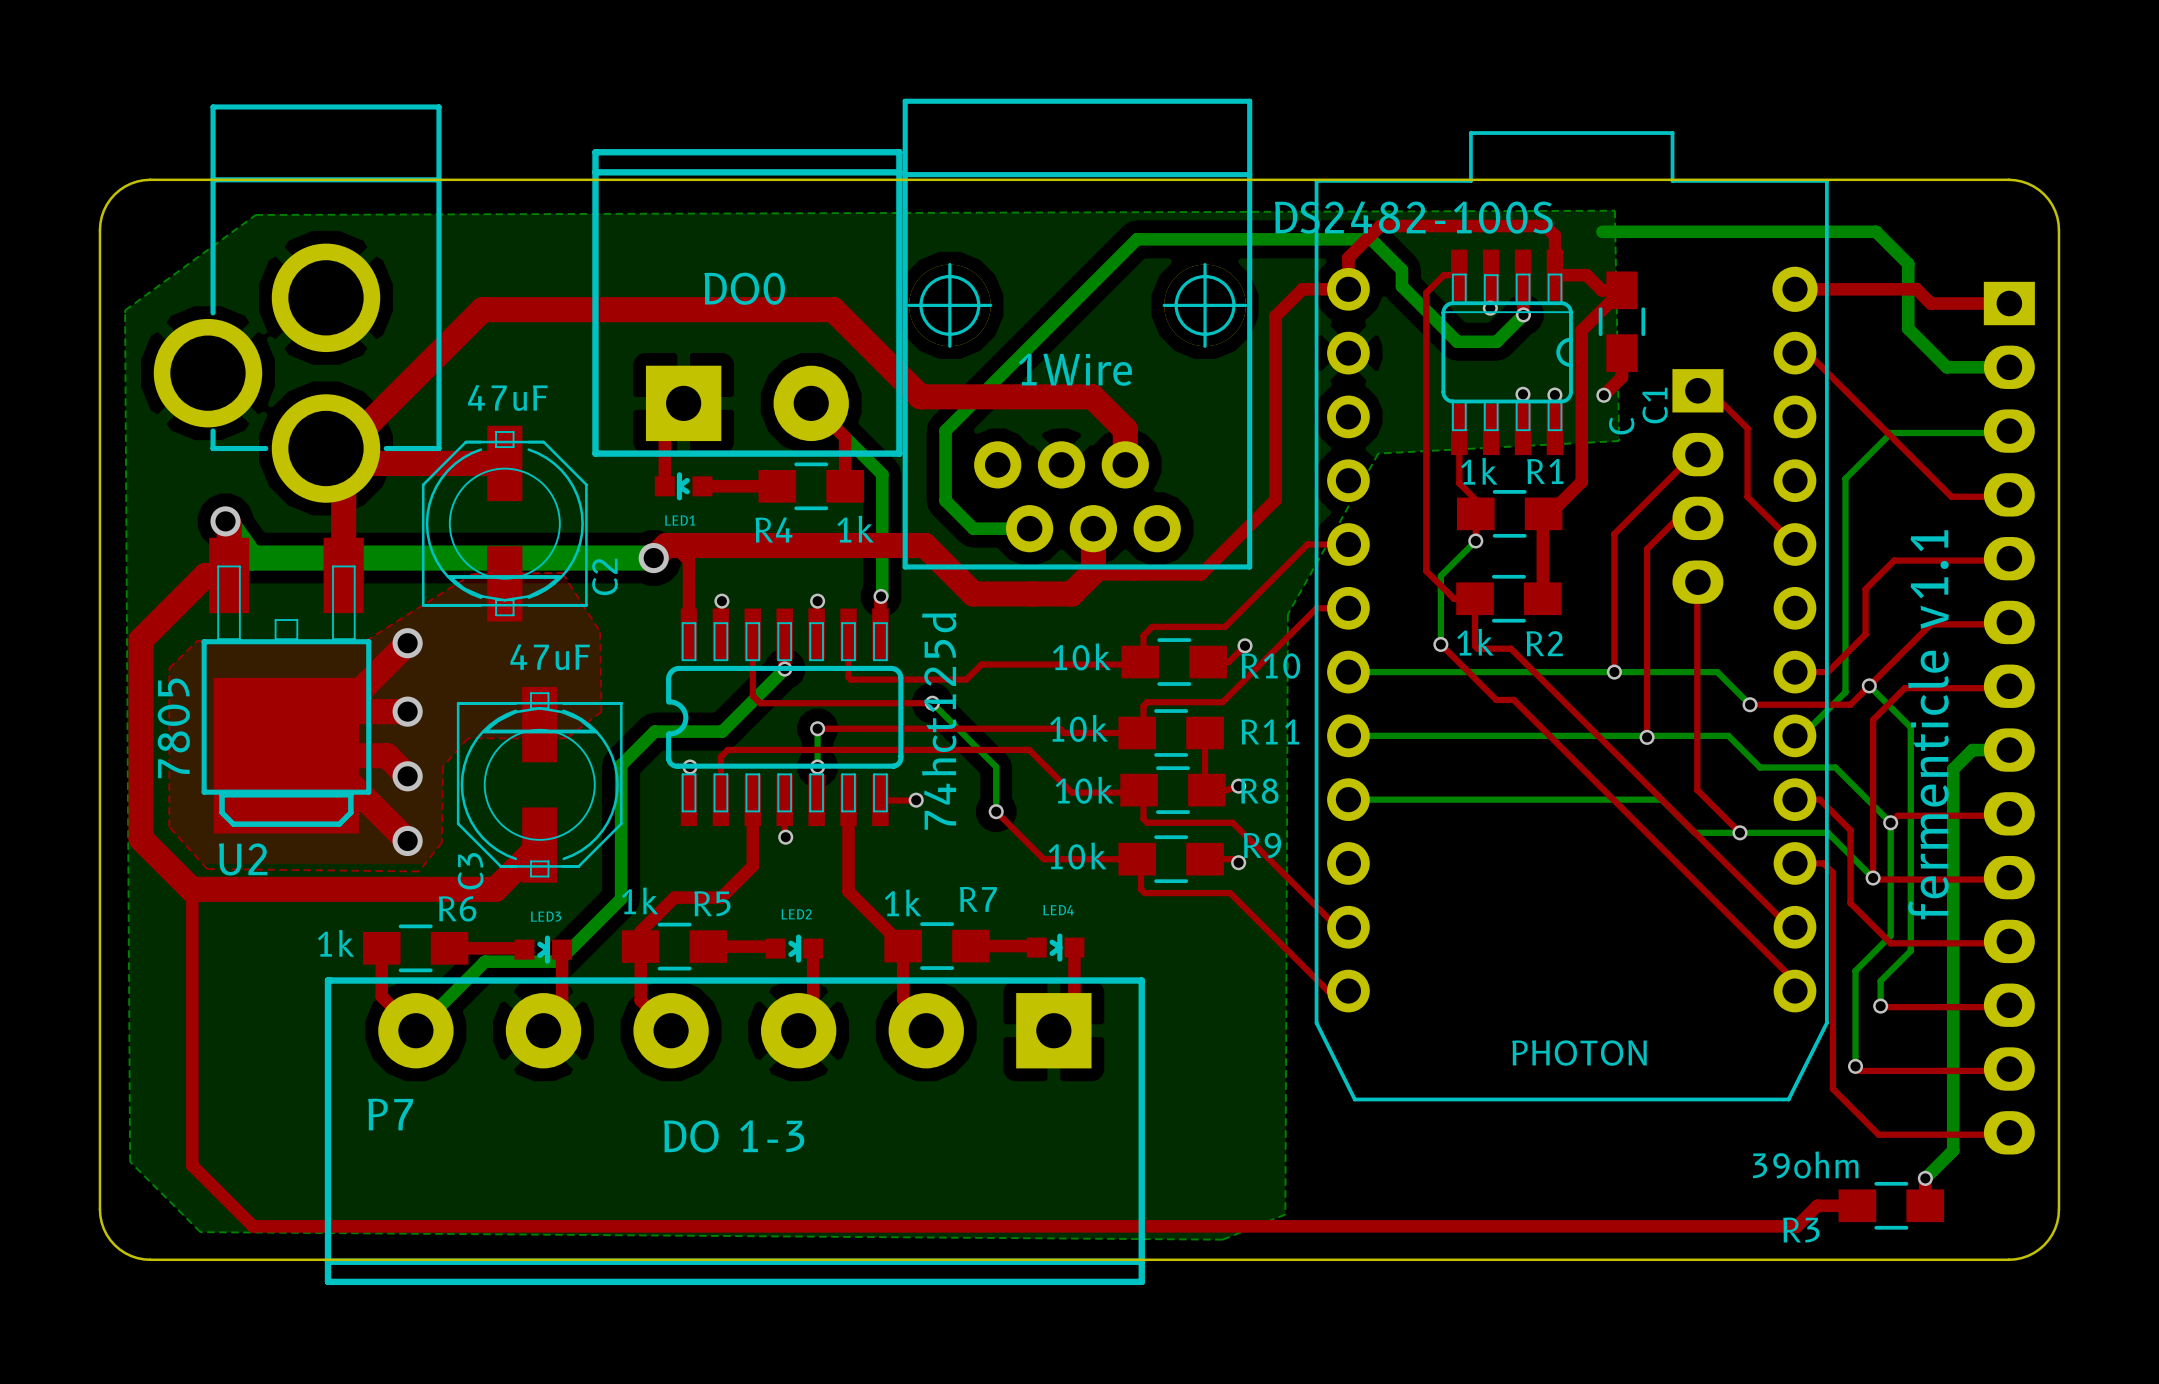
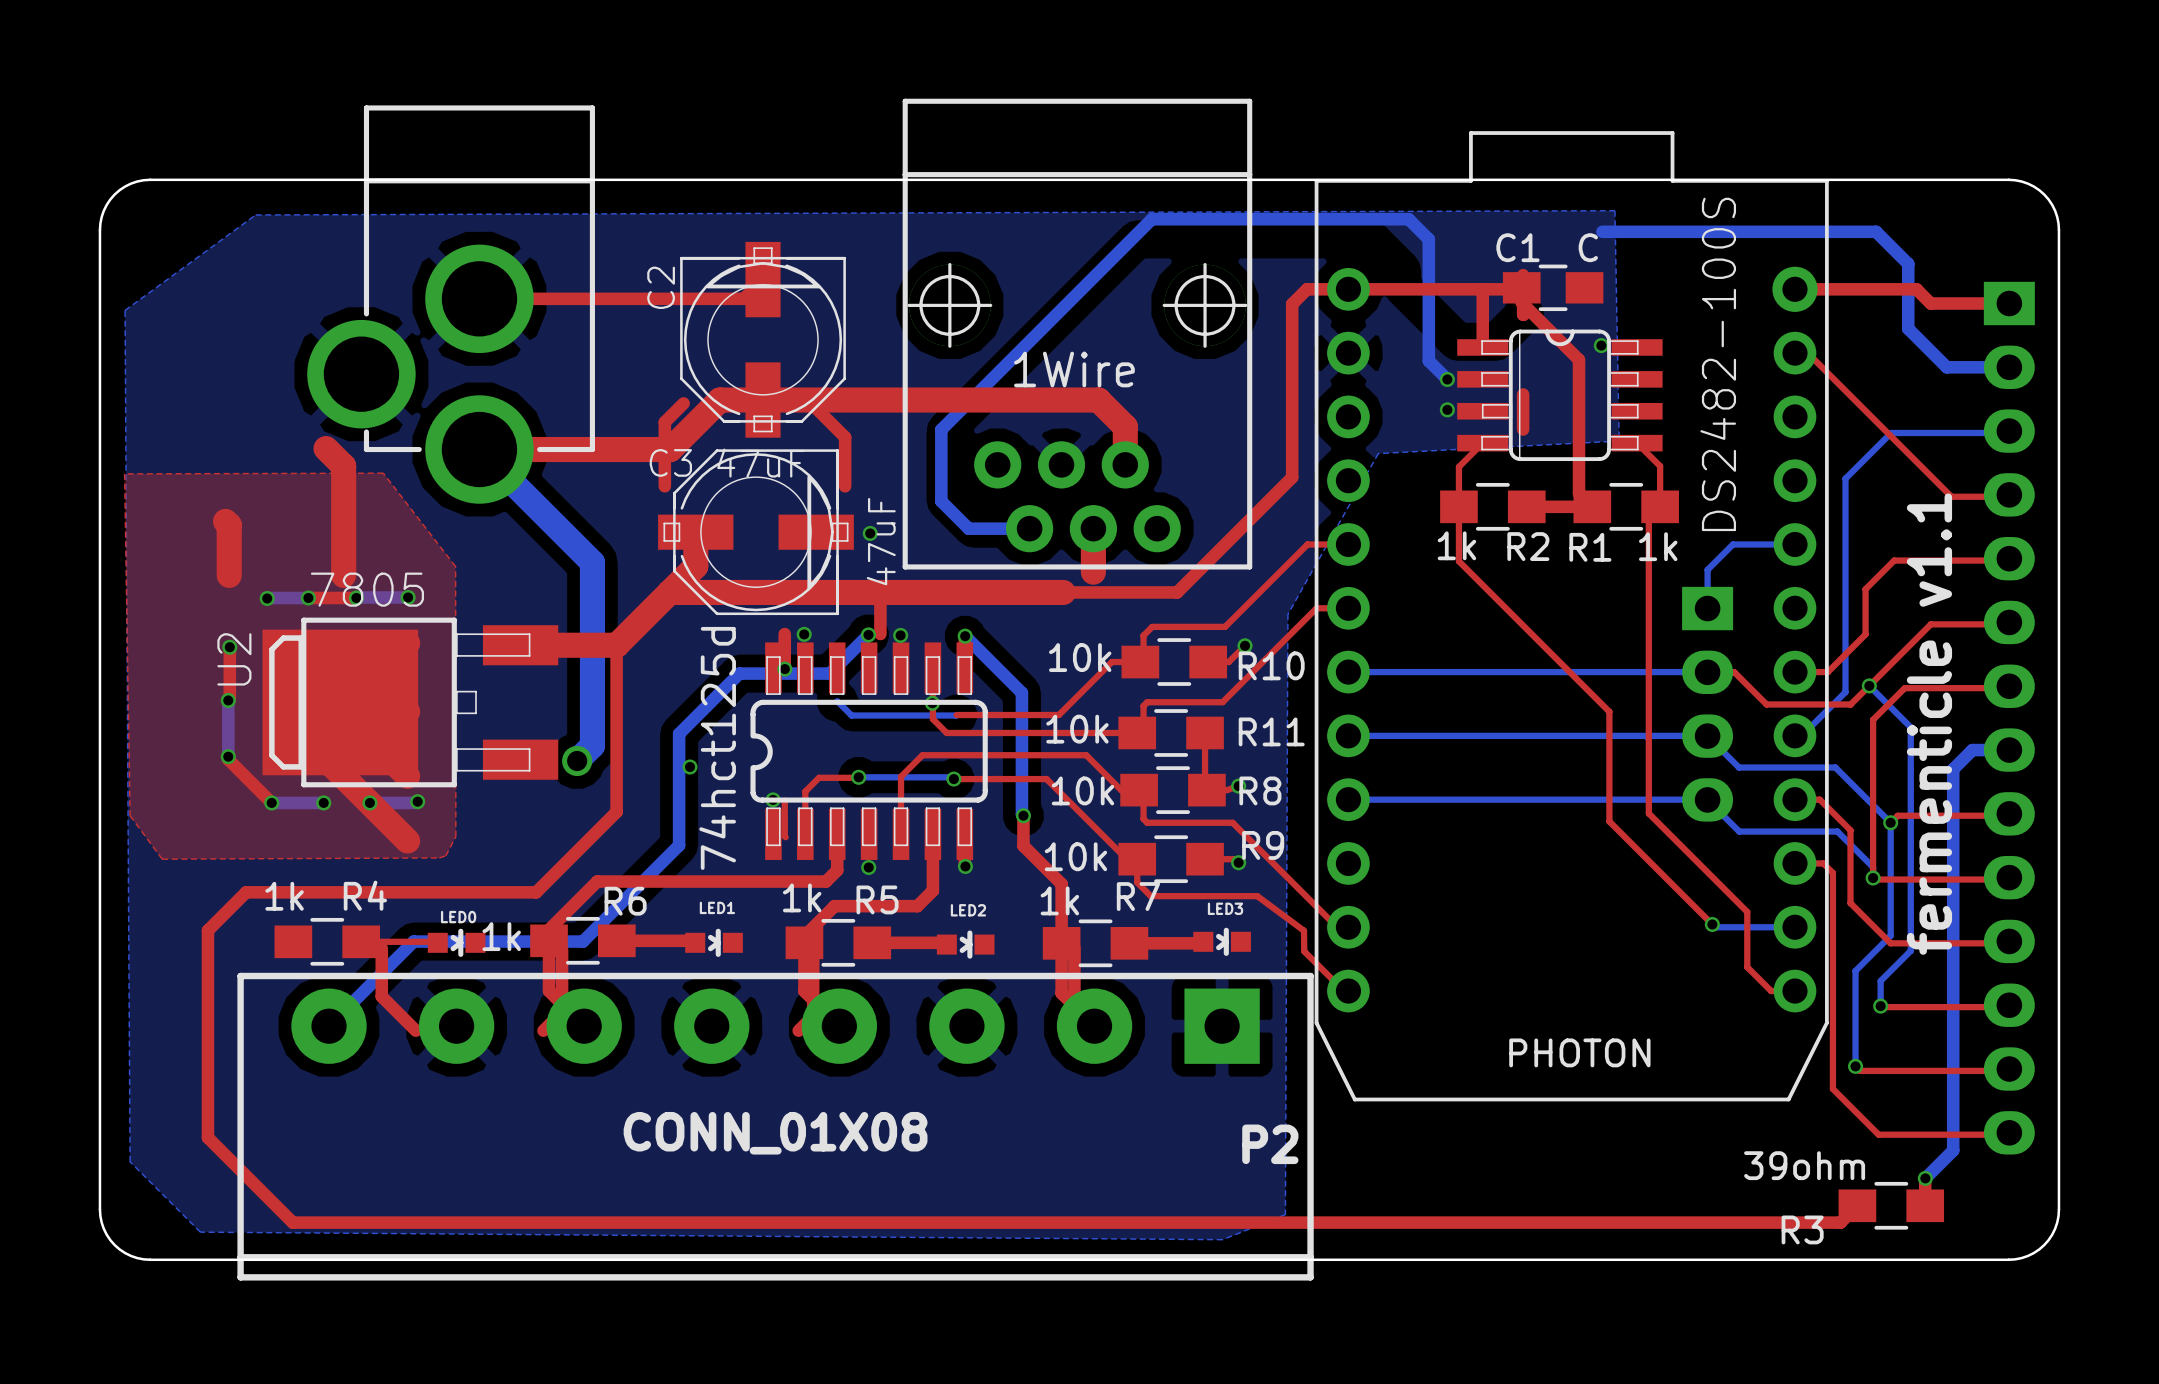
part value position: DS2482-100S (1413, 217) -> DS2482-100S (1718, 364)
top track: (1459, 275) (1443, 275) (1426, 292) (1426, 571) (1453, 598) (1475, 598) (1475, 646) (1477, 648) (1510, 648) (1789, 927) (1795, 927) -> none
top track: none -> (763, 279) (743, 298) (479, 298)
top track: (1307, 289) (1302, 289) (1275, 316) (1275, 499) (1201, 574) (1095, 574) (1093, 572) (1071, 593) (973, 593) (925, 545) (666, 545) (653, 558) -> (1307, 289) (1292, 304) (1292, 477) (1177, 592) (669, 592)
top track: (1348, 289) (1348, 257) (1380, 226) (1545, 226) (1555, 235) (1555, 275) (1586, 275) (1601, 290) (1621, 290) (1581, 330) (1581, 481) (1549, 513) (1542, 514) (1542, 598) -> (1348, 289) (1521, 287) (1521, 302) (1579, 359) (1579, 493) (1592, 506) (1526, 506)
top track: none -> (1482, 289) (1482, 347)
part: DO0 (747, 302) -> none
part position: (297, 303) -> (451, 304)
via: (1490, 308) -> none
bottom track: (1523, 314) (1496, 341) (1457, 341) (1401, 286) (1401, 269) (1371, 239) (1136, 239) (945, 430) (945, 500) (973, 528) -> (1447, 379) (1428, 360) (1428, 239) (1408, 219) (1151, 219) (941, 429) (941, 501) (968, 528) (973, 528)
via: (1523, 314) -> none
C1 rotation: 0° (1621, 321) -> 90° clockwise (1553, 287)
C1 position: (1621, 321) -> (1553, 287)
via: none -> (1601, 345)
part rotation: 0° (1507, 352) -> 90° counterclockwise (1559, 395)
top track: (1621, 353) (1621, 377) (1603, 395) -> none
via: none -> (1447, 379)
top track: (1697, 387) (1706, 387) (1747, 428) (1747, 497) (1795, 544) -> none
via: (1523, 394) -> none
via: (1554, 395) -> none
via: (1603, 395) -> none
bottom track: (836, 403) (811, 403) (882, 474) (881, 596) -> none
C1 name position: C1 (1655, 405) -> C1 (1517, 247)
via: none -> (1447, 409)
C1 value position: C (1621, 425) -> C (1588, 247)
top track: (1125, 429) (1092, 396) (920, 396) (833, 309) (482, 309) (343, 448) (305, 448) -> (1125, 429) (1125, 426) (1098, 400) (719, 400) (670, 449) (479, 449)
top track: (1459, 429) (1459, 483) (1475, 499) (1475, 540) -> none
top track: none -> (1482, 443) (1458, 466) (1458, 561) (1609, 711) (1609, 821) (1712, 924)
bottom track: none -> (479, 449) (592, 562) (592, 745) (577, 760)
top track: (1696, 451) (1614, 533) (1614, 672) -> none
top track: (340, 463) (504, 463) -> none
R1 value position: 1k (1479, 471) -> 1k (1658, 546)
R1 name position: R1 (1545, 471) -> R1 (1590, 547)
top zone outline: none -> (383, 473) (455, 566) (455, 836) (445, 855) (439, 857) (162, 859) (130, 815) (124, 473) (383, 473)
LED1 rotation: 0° (683, 486) -> 180° (714, 942)
LED1 position: (683, 486) -> (714, 942)
top track: (702, 486) (777, 486) -> none
R4 position: (811, 486) -> (327, 941)
part position: (1697, 486) -> (1707, 704)
R1 position: (1509, 513) -> (1626, 506)
top track: (1697, 515) (1680, 515) (1647, 549) (1647, 737) -> none
bottom track: (225, 521) (251, 558) (653, 558) -> none
via: (225, 521) -> none
C2 rotation: 0° (504, 523) -> 180° (763, 339)
C2 position: (504, 523) -> (763, 339)
R4 name position: R4 (773, 529) -> R4 (365, 895)
R4 value position: 1k (855, 529) -> 1k (284, 896)
top track: none -> (695, 532) (695, 566) (616, 645) (520, 645)
via: none -> (870, 533)
bottom track: (1475, 540) (1440, 575) (1440, 644) -> none
via: (1475, 540) -> none
bottom track: none -> (1795, 544) (1732, 544) (1707, 569) (1707, 608)
top track: (673, 545) (689, 560) (689, 634) -> none
via: (653, 558) -> none
top zone outline: (562, 572) (472, 574) (365, 640) (197, 640) (169, 668) (169, 826) (207, 868) (418, 871) (442, 842) (443, 766) (468, 738) (566, 738) (601, 711) (600, 631) (562, 572) -> none
top track: (210, 575) (229, 575) (205, 575) (141, 639) (141, 838) (191, 889) (495, 889) (539, 845) -> none
top track: (1697, 579) (1697, 790) (1739, 832) -> none
via: (881, 596) -> none
top track: none -> (308, 597) (356, 597)
bottom track: none -> (308, 597) (267, 598)
via: none -> (308, 597)
via: none -> (356, 597)
bottom track: none -> (408, 597) (356, 597)
via: none -> (408, 597)
via: none -> (267, 598)
R2 position: (1508, 598) -> (1492, 506)
via: (721, 601) -> none
via: (817, 601) -> none
top track: (752, 634) (752, 695) (760, 703) (932, 703) -> none
via: none -> (804, 634)
top track: (848, 634) (848, 677) (850, 679) (966, 679) (981, 664) (1143, 664) -> none
bottom track: none -> (868, 634) (829, 673) (739, 673) (679, 733) (679, 845) (582, 941) (413, 941) (329, 1026)
via: none -> (868, 634)
via: none -> (900, 635)
bottom track: none -> (965, 636) (1021, 692) (1023, 815)
via: none -> (965, 636)
R2 value position: 1k (1475, 642) -> 1k (1456, 545)
via: (407, 643) -> none
R2 name position: R2 (1544, 643) -> R2 (1528, 546)
top track: (1440, 644) (1496, 699) (1513, 699) (1795, 981) (1795, 991) -> (1637, 443) (1660, 466) (1660, 506) (1648, 518) (1648, 813) (1747, 911) (1747, 967) (1771, 991) (1795, 991)
via: (1440, 644) -> none
top track: none -> (229, 647) (228, 700)
via: none -> (229, 647)
top track: none -> (1140, 662) (1111, 662) (1058, 715) (956, 715)
bottom track: (784, 669) (722, 731) (654, 731) (621, 765) (621, 898) (558, 961) (484, 961) (415, 1030) -> none
via: (1614, 672) -> none
bottom track: (1707, 672) (1717, 672) (1750, 704) -> none
U2 rotation: 0° (286, 685) -> 90° clockwise (410, 702)
bottom track: none -> (228, 700) (228, 756)
via: none -> (228, 700)
bottom track: none -> (837, 701) (851, 715) (956, 715)
bottom track: (932, 703) (996, 767) (996, 811) -> none
top track: (1750, 704) (1850, 704) -> (1707, 672) (1734, 672) (1766, 704) (1850, 704)
via: (1750, 704) -> none
via: (407, 711) -> none
part position: (784, 717) -> (869, 751)
part value position: 74hct125d (939, 721) -> 74hct125d (717, 748)
top track: (817, 728) (1060, 728) (1064, 732) -> (932, 667) (932, 719) (946, 732) (1064, 732)
bottom track: (817, 728) (817, 767) -> none
via: (817, 728) -> none
bottom track: (1707, 735) (1728, 735) (1760, 767) -> (1707, 735) (1738, 767) (1760, 767)
via: (1647, 737) -> none
top track: none -> (228, 756) (228, 759) (271, 802)
via: none -> (228, 756)
via: none -> (577, 760)
via: (817, 767) -> none
via: (407, 776) -> none
top track: none -> (858, 777) (819, 777) (805, 791) (805, 834)
bottom track: none -> (858, 777) (952, 777) (953, 779)
via: none -> (858, 777)
via: none -> (953, 779)
C3 rotation: 0° (539, 784) -> 90° clockwise (755, 532)
C3 position: (539, 784) -> (755, 532)
top track: none -> (1139, 790) (1121, 790) (1086, 755) (922, 755) (901, 776) (901, 834)
top track: (1143, 792) (1071, 792) (1029, 749) (727, 749) (720, 756) (720, 800) -> none
via: none -> (773, 799)
bottom track: (1661, 799) (1694, 832) (1827, 832) (1873, 878) -> (1661, 799) (1707, 799) (1739, 831) (1837, 831) (1873, 867) (1873, 878)
top track: (752, 800) (752, 866) (721, 897) (674, 897) (640, 931) (640, 1000) (671, 1030) -> none
top track: (848, 800) (848, 891) (903, 946) (903, 999) (937, 1033) -> none
top track: (916, 800) (880, 800) -> none
via: (916, 800) -> none
bottom track: none -> (417, 801) (369, 802)
via: none -> (417, 801)
bottom track: none -> (271, 802) (323, 802)
via: none -> (271, 802)
via: none -> (323, 802)
via: none -> (369, 802)
top track: (996, 811) (1043, 859) (1126, 859) -> (953, 779) (1046, 779) (1126, 859)
via: (996, 811) -> none
top track: none -> (1023, 815) (1023, 845) (1061, 884) (1061, 993) (1094, 1026)
via: none -> (1023, 815)
via position: (1739, 832) -> (1712, 924)
top track: none -> (837, 834) (837, 870) (826, 881) (597, 881) (549, 929) (549, 991) (584, 1026)
top track: none -> (932, 834) (932, 890) (917, 906) (834, 906) (804, 936) (804, 991) (839, 1026)
via: (785, 837) -> none
via: (407, 840) -> none
top track: (1141, 855) (1141, 889) (1144, 893) (1230, 893) (1328, 991) (1343, 991) -> (1137, 859) (1137, 882) (1150, 896) (1257, 896) (1304, 930) (1304, 951) (1343, 991)
via: none -> (965, 866)
via: none -> (868, 867)
top track: (192, 889) (192, 1165) (253, 1226) (1796, 1226) (1817, 1205) (1857, 1205) -> (616, 645) (616, 811) (536, 892) (246, 892) (207, 930) (207, 1137) (292, 1222) (1840, 1222) (1857, 1205)
bottom track: none -> (1712, 924) (1715, 927) (1795, 927)
top track: none -> (616, 940) (693, 940) (695, 942)
top track: none -> (361, 941) (437, 942)
top track: none -> (1203, 941) (1129, 943)
LED0: none -> (456, 942)
top track: none -> (872, 942) (945, 942) (946, 944)
R5 position: (674, 946) -> (838, 942)
top track: (708, 946) (773, 946) (775, 948) -> none
R7 position: (937, 946) -> (1095, 943)
top track: (970, 946) (1036, 947) -> none
LED4: (1055, 947) -> none
R6 position: (415, 948) -> (582, 940)
top track: (449, 948) (524, 949) -> none
LED2 position: (794, 948) -> (965, 944)
LED3 position: (543, 949) -> (1222, 941)
P2: none -> CONN_01X08 (775, 1126)
P7: DO 1-3 (734, 1131) -> none

